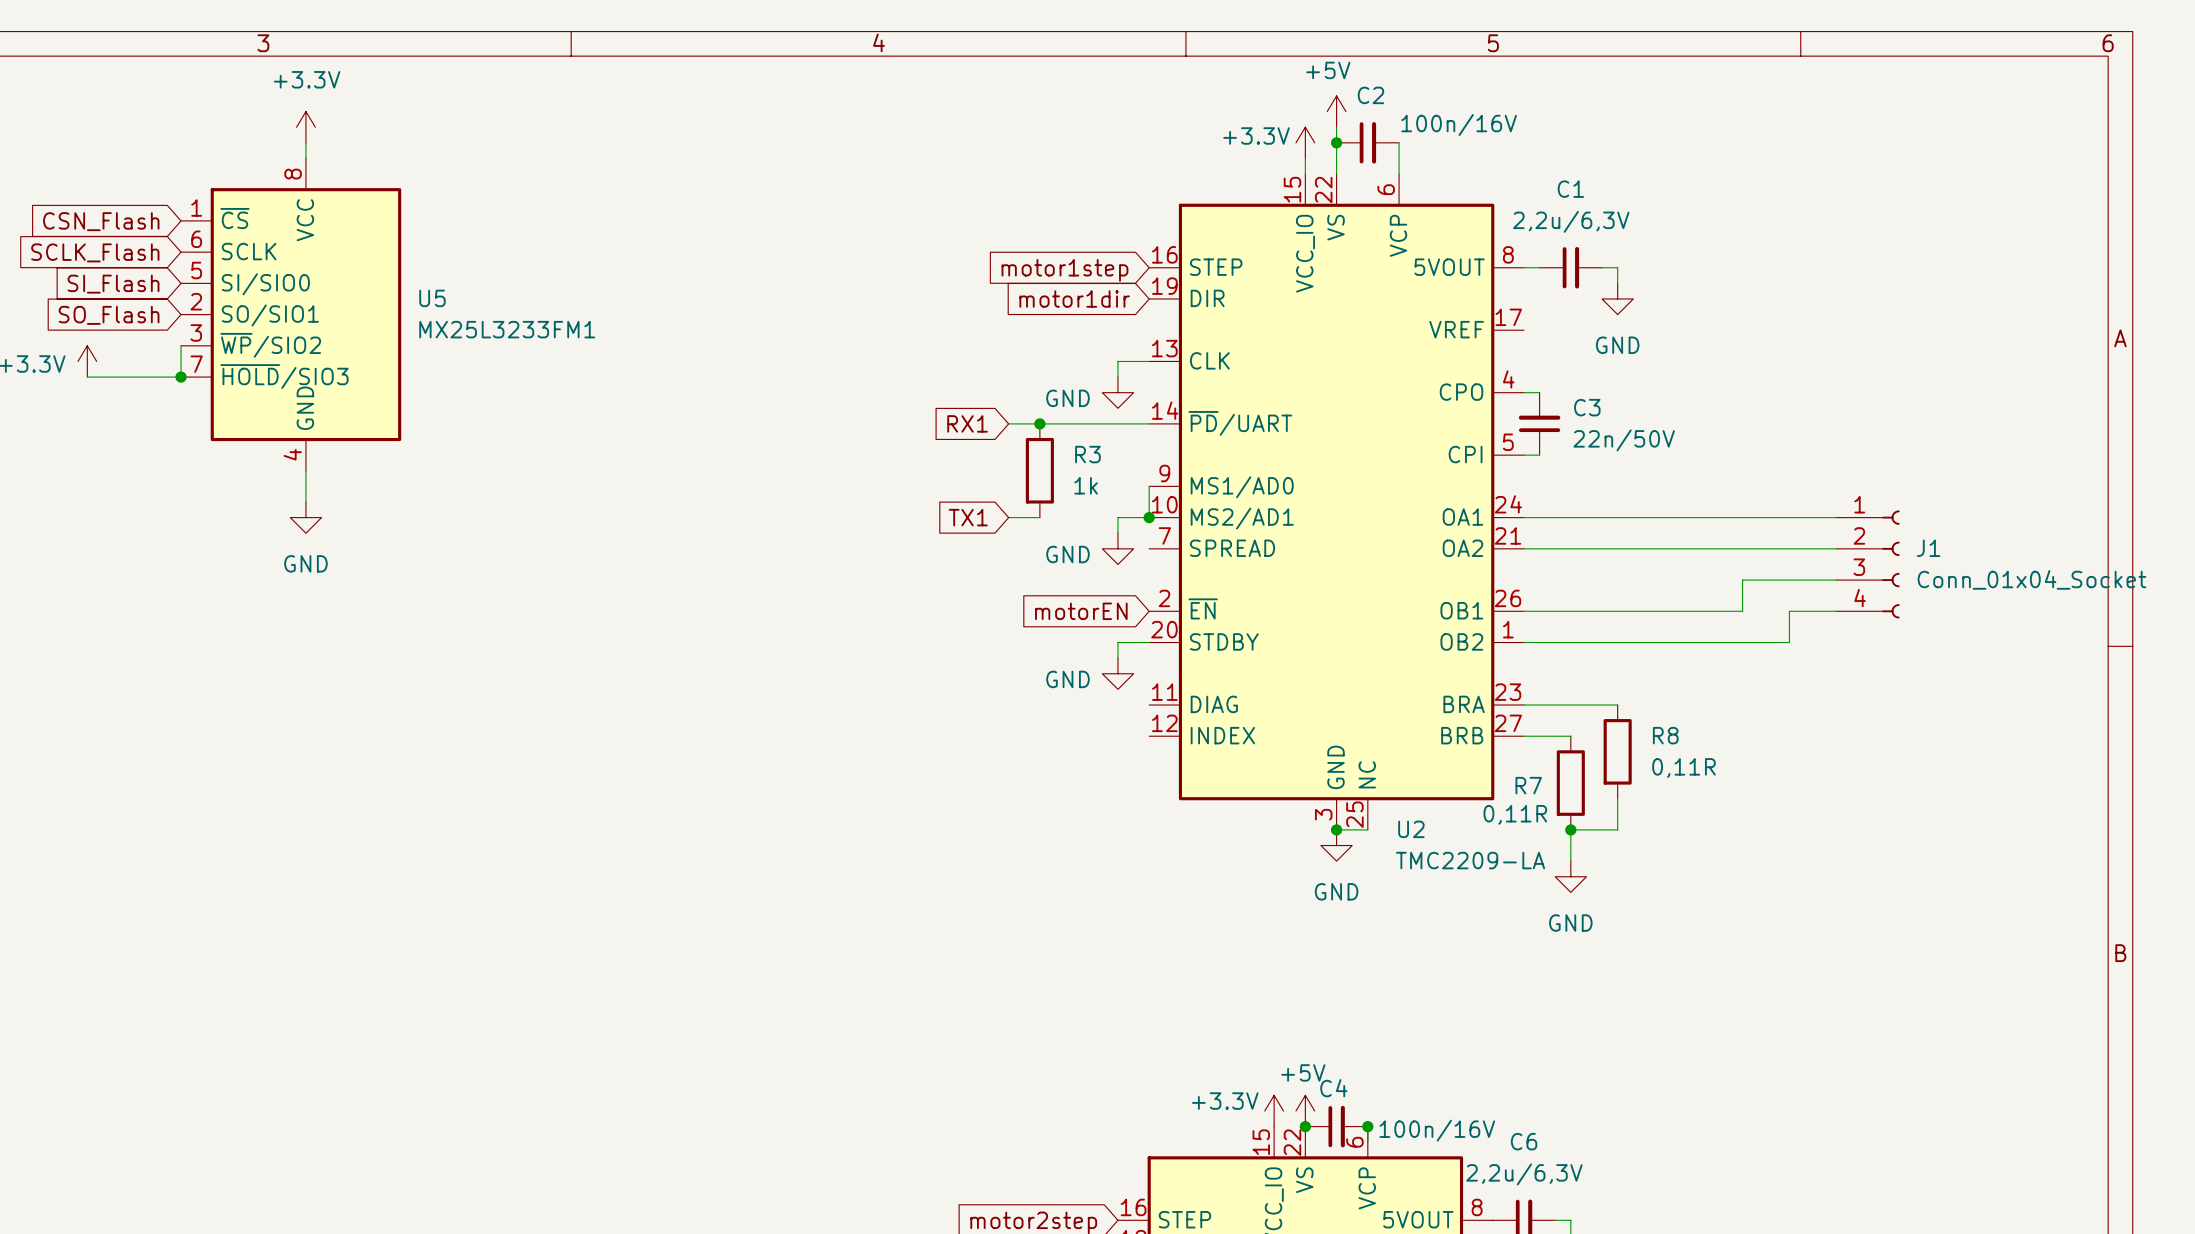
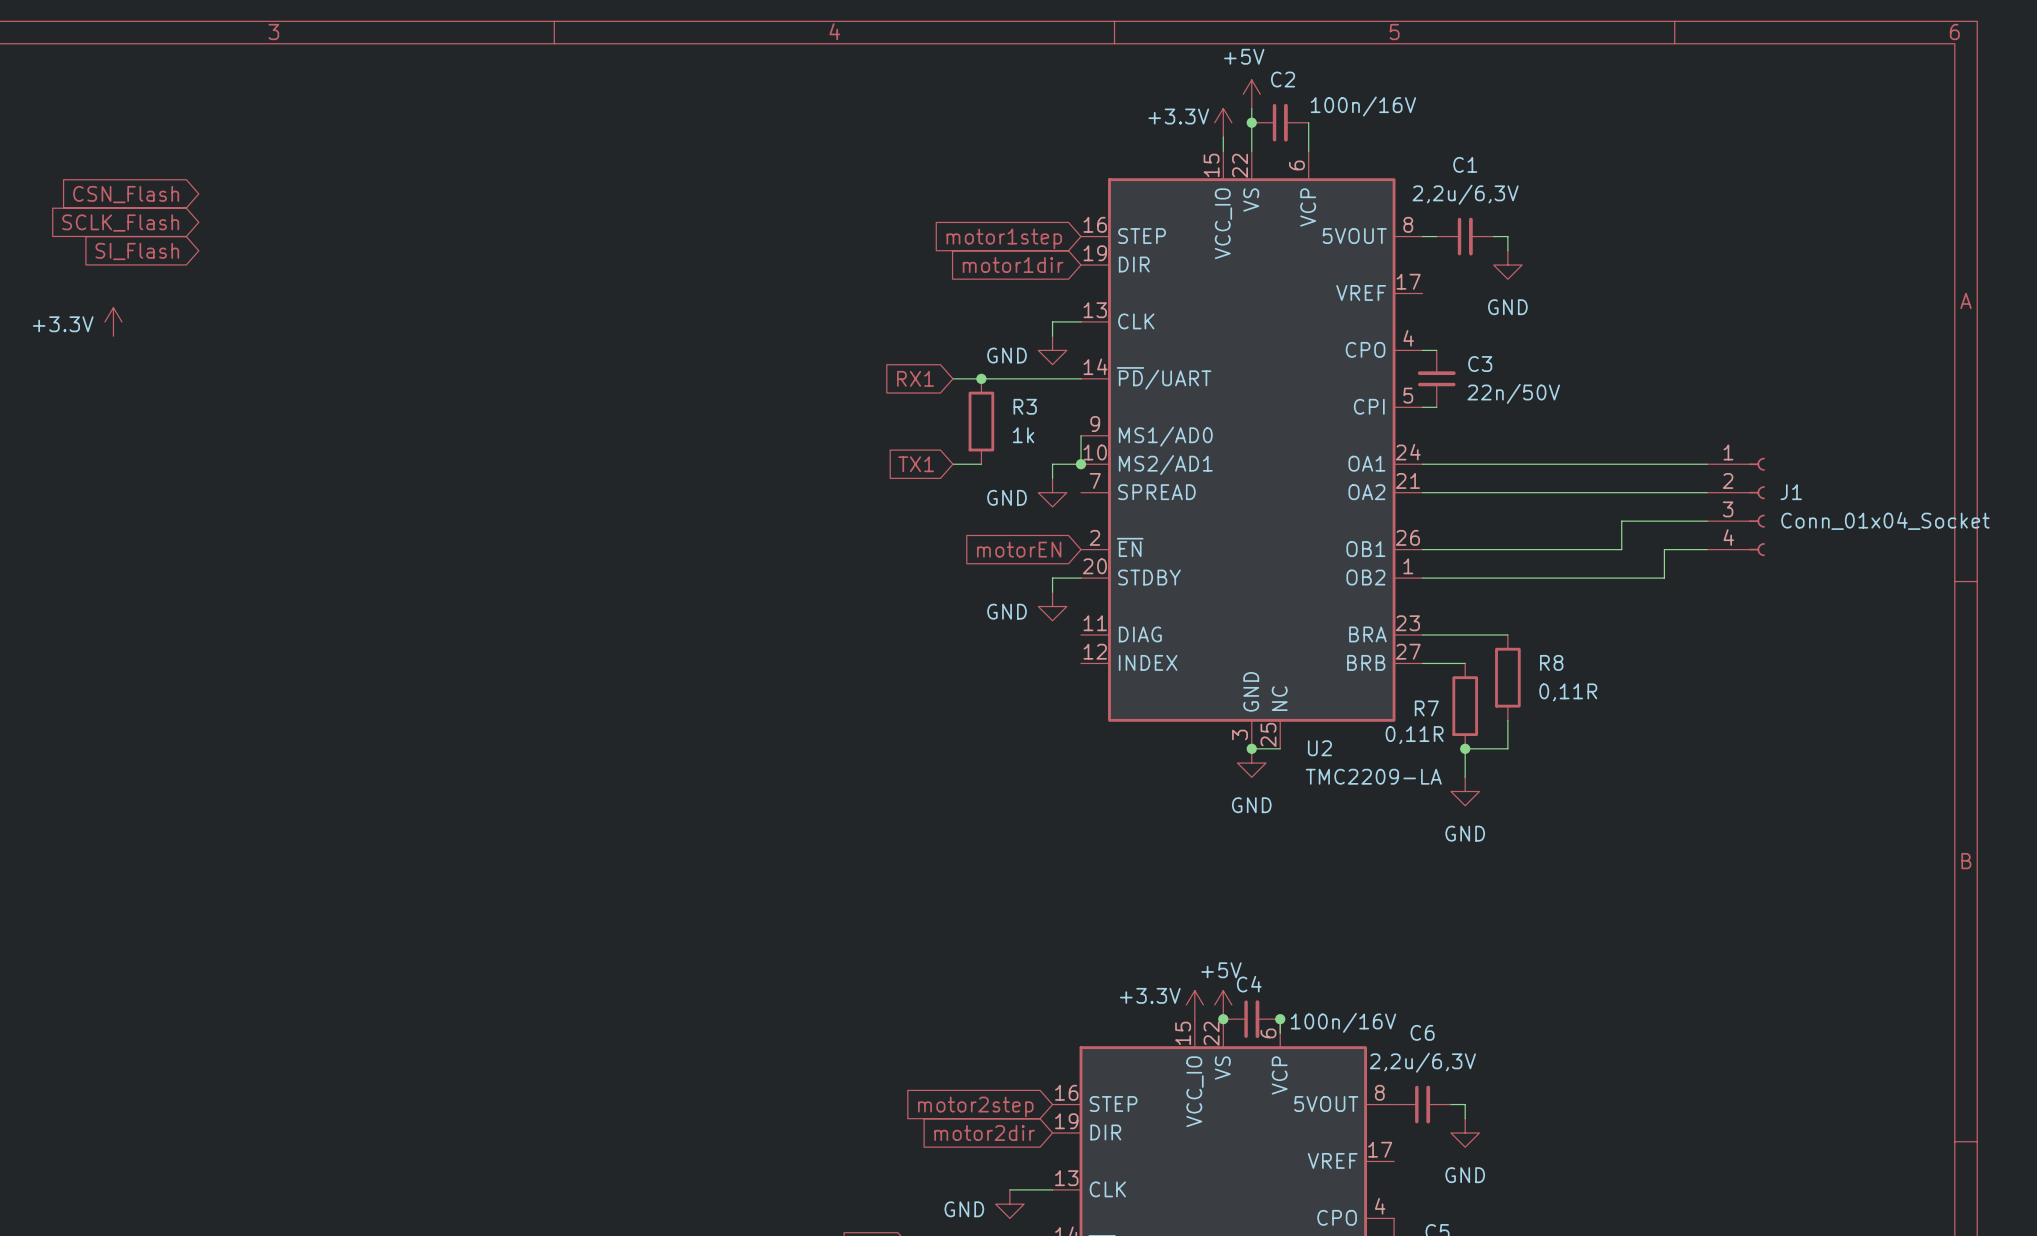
power symbol: +3.3V (305, 127) -> none
wire: (305, 142) (305, 158) -> none
U5: MX25L3233FM1 (291, 314) -> none
global label: SO_Flash (109, 315) -> none
wire: (181, 345) (181, 377) (87, 377) -> none
junction: (181, 377) -> none
wire: (305, 470) (305, 501) -> none
power symbol: GND (305, 517) -> none

